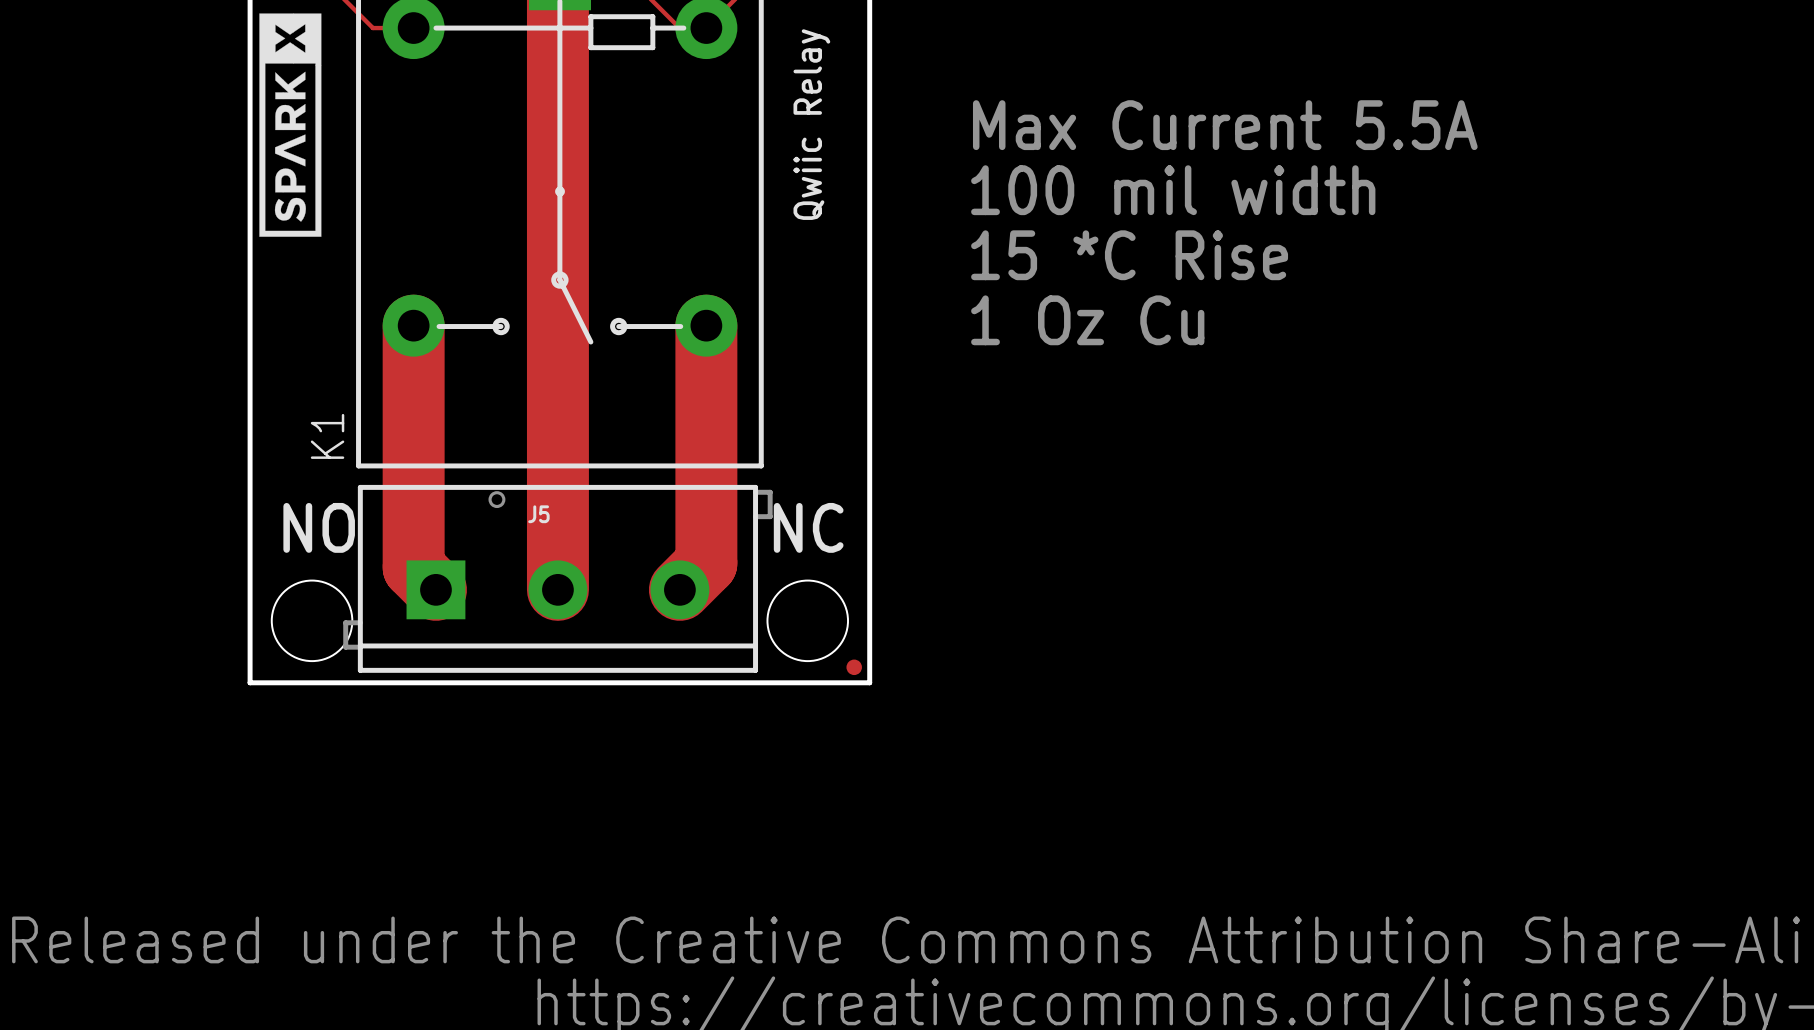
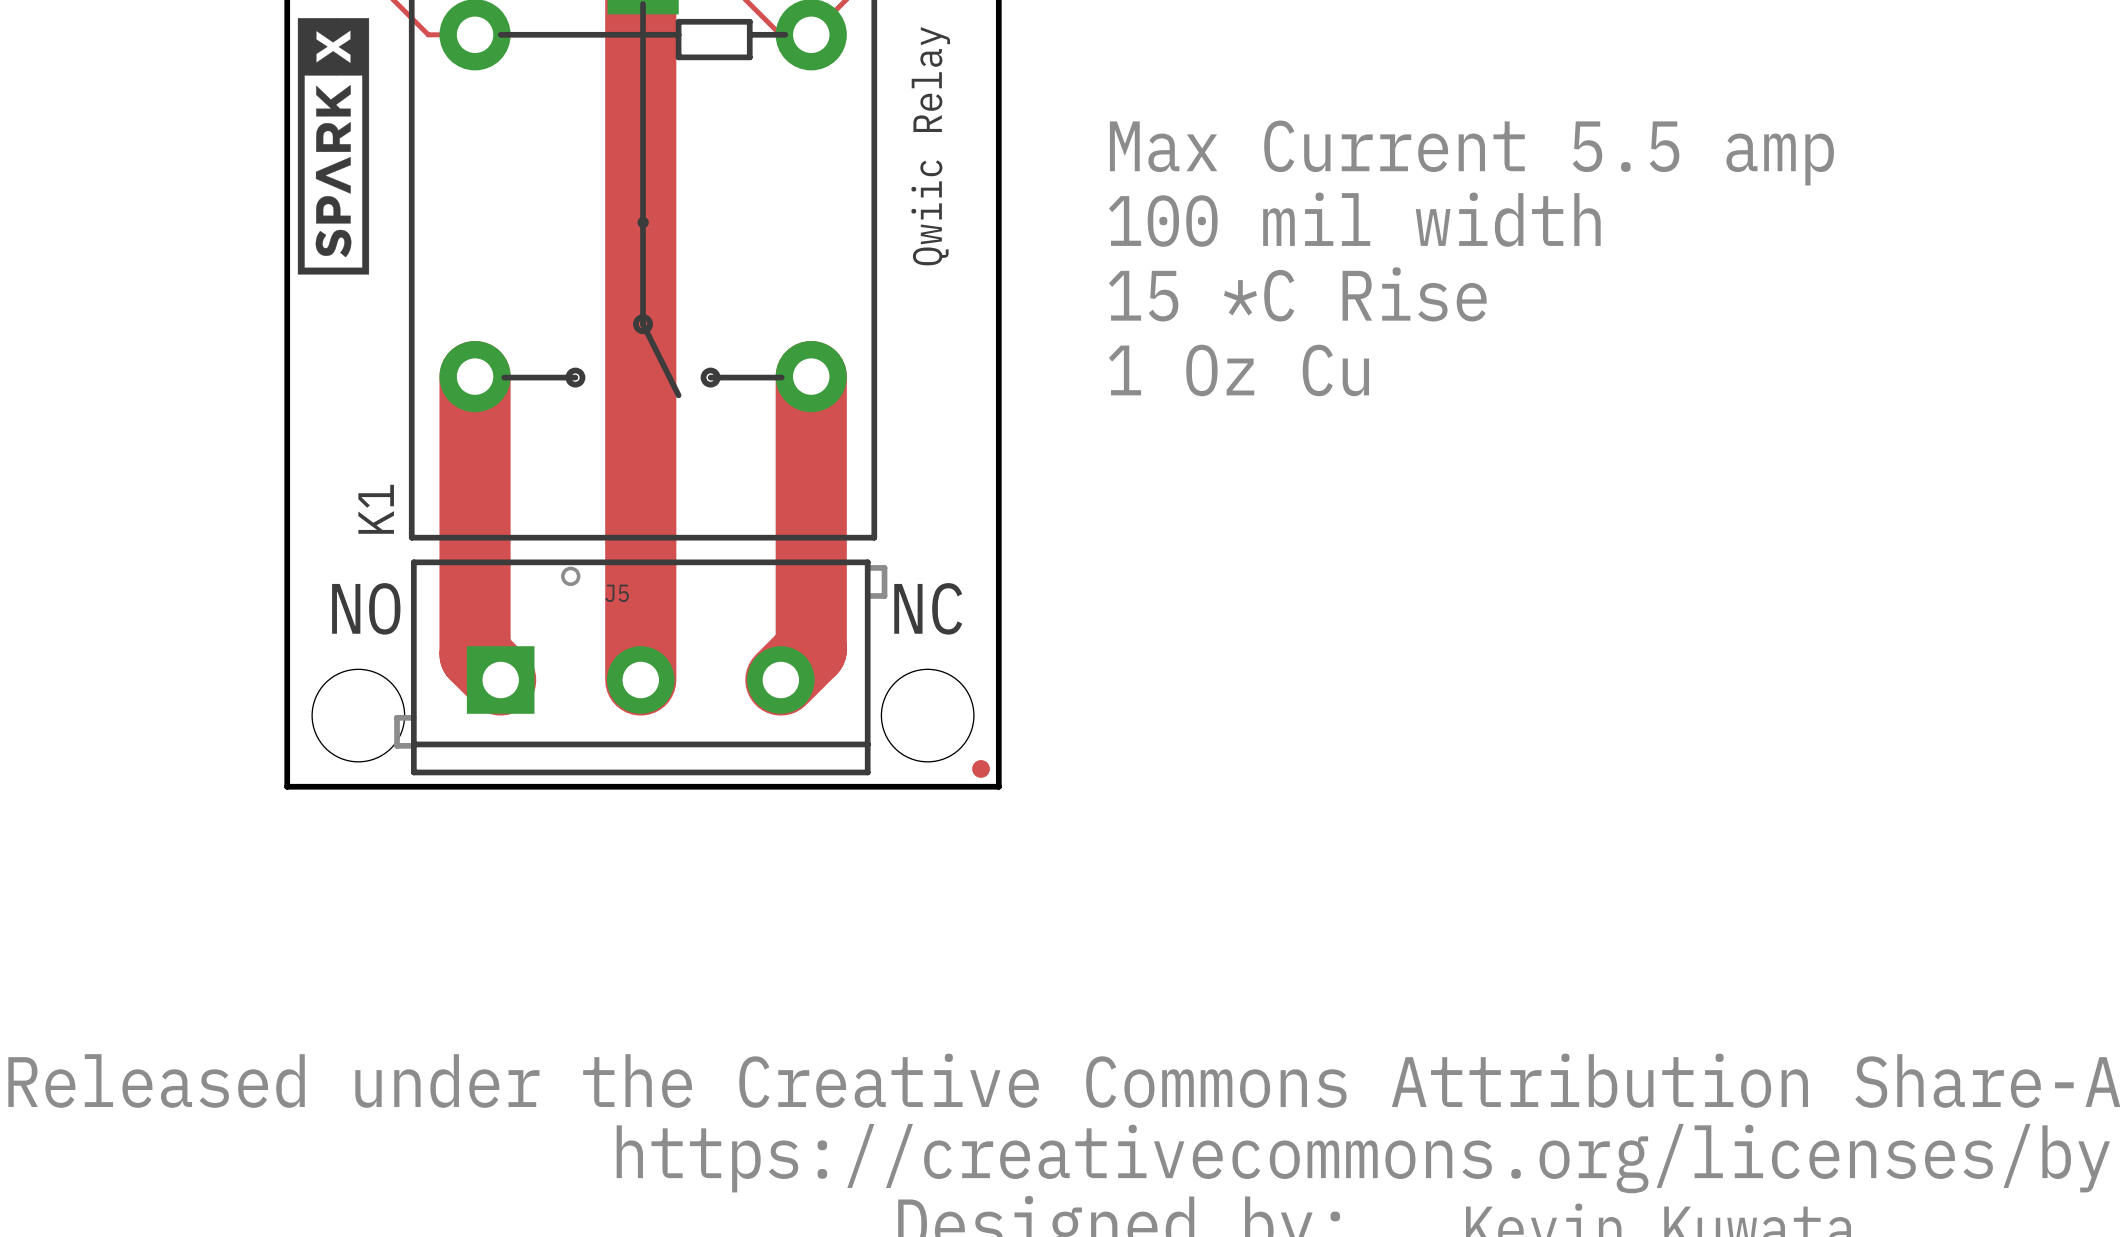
text: Max Current 5.5A (1225, 125) -> Max Current 5.5 amp (1471, 153)

